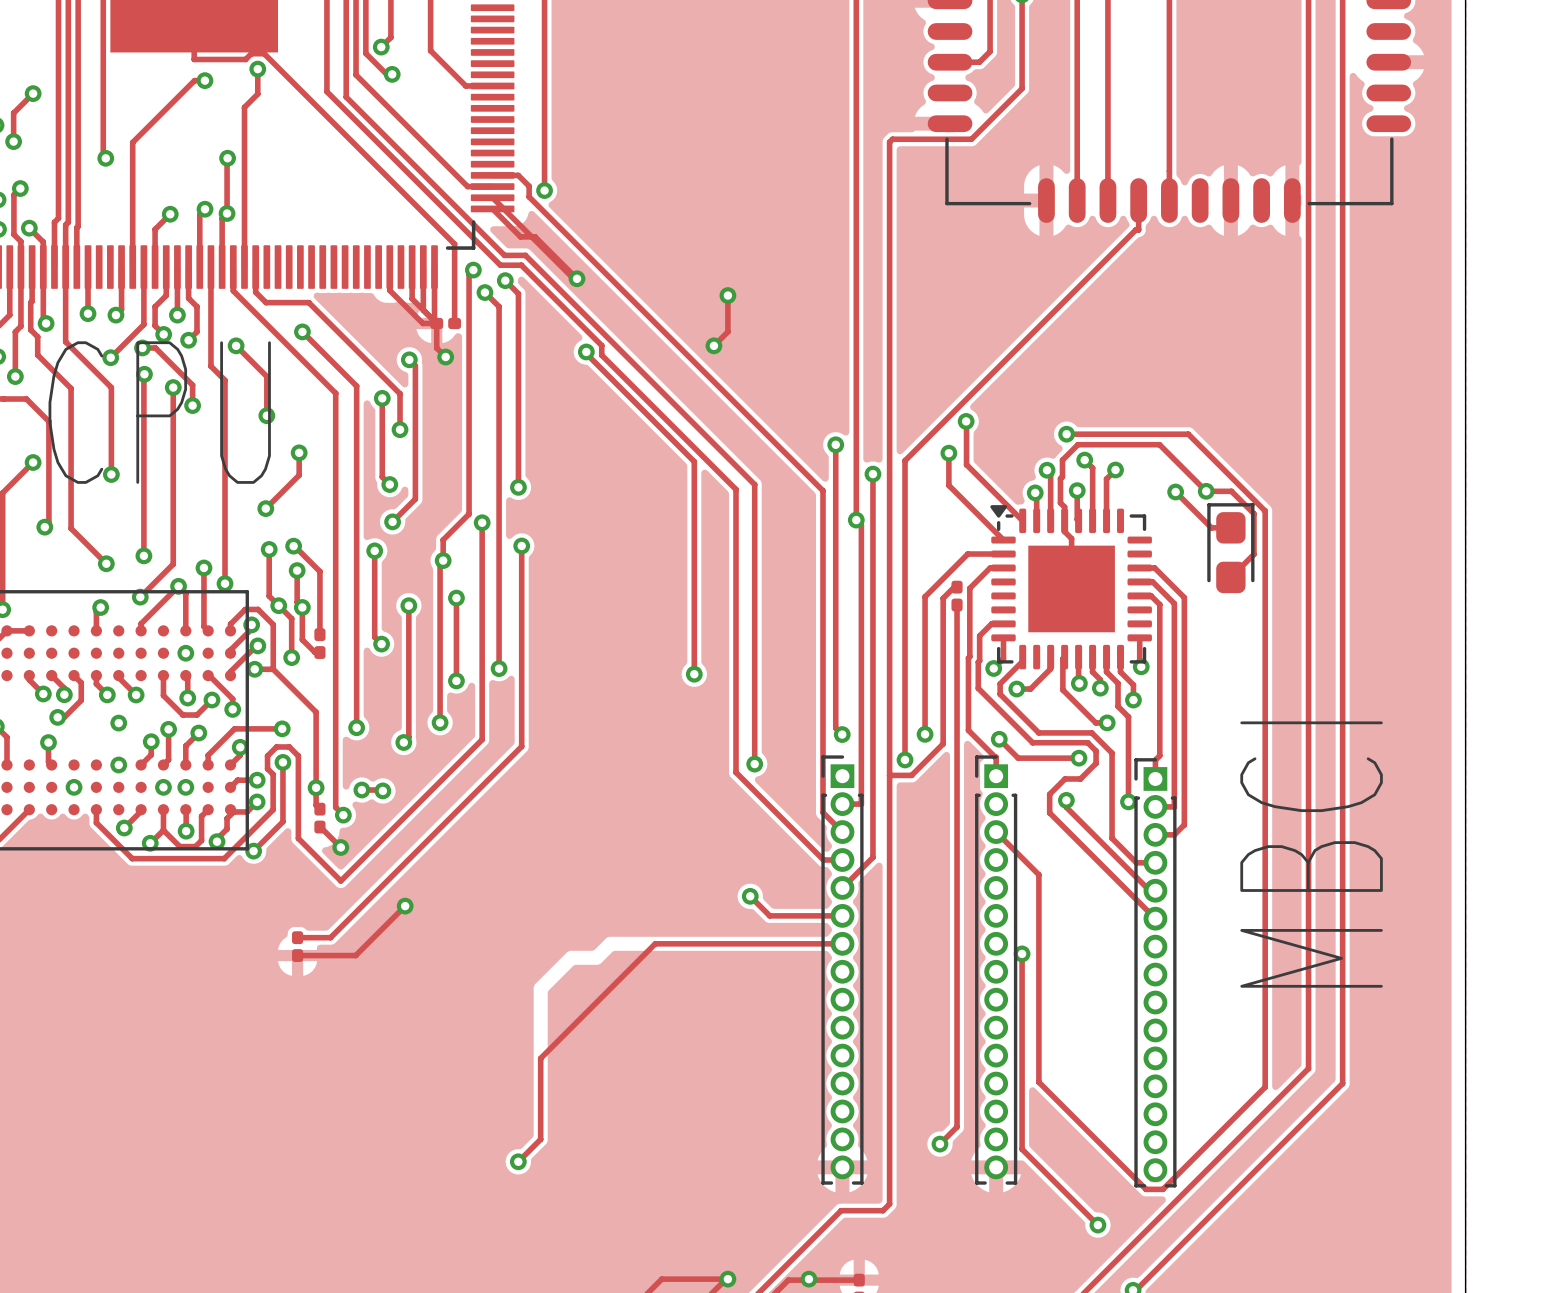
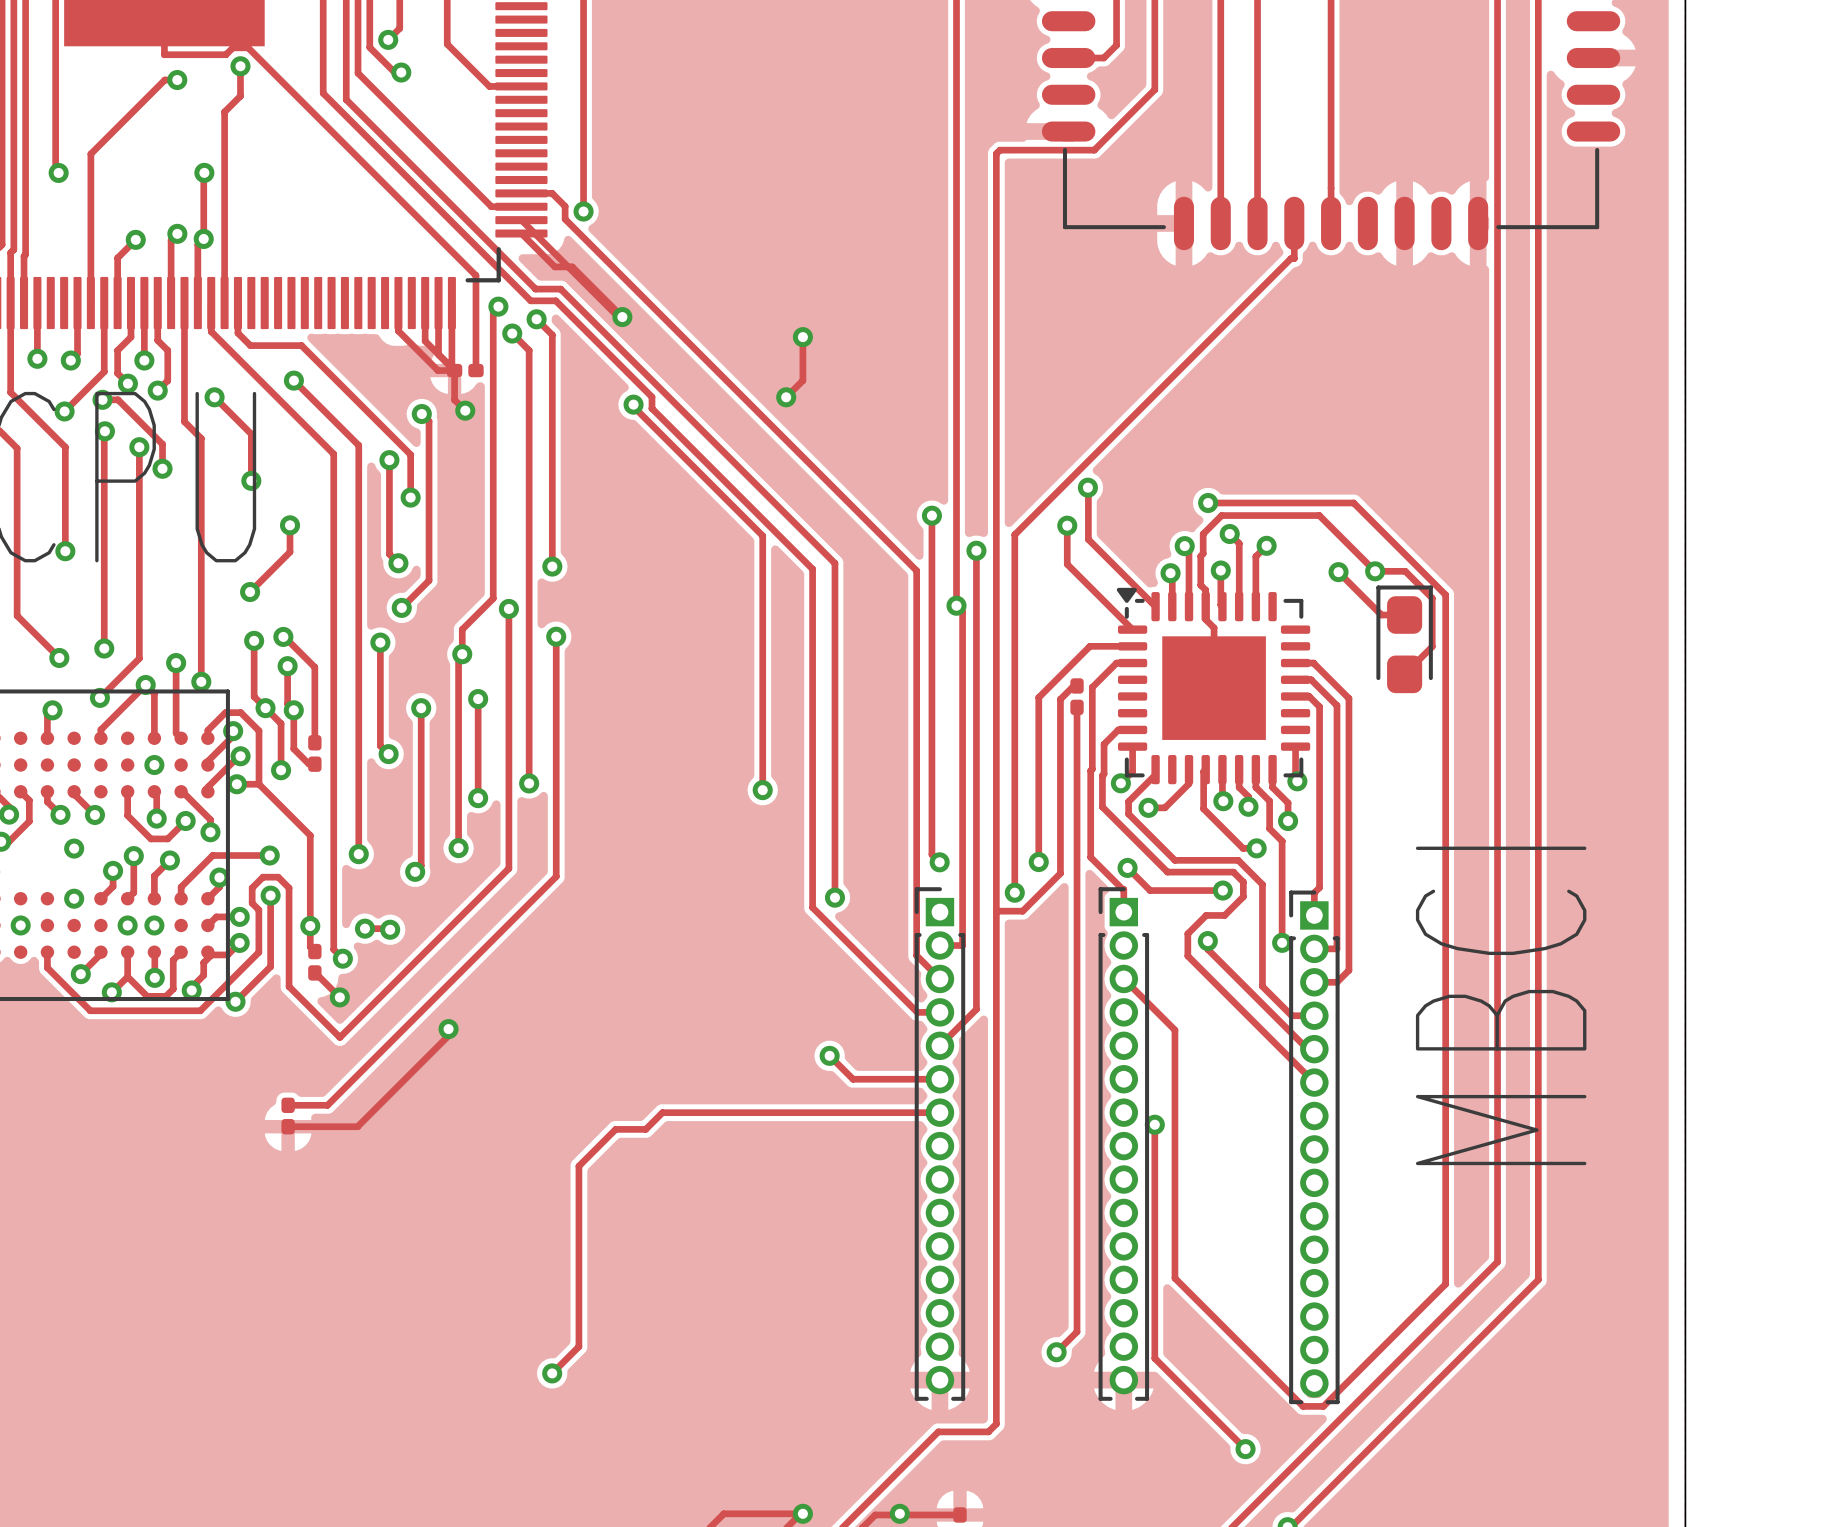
track: none -> (448, 1029) (448, 1035) (416, 1067)
via position: (405, 906) -> (448, 1029)
track: (655, 943) (540, 1058) -> (715, 1112) (662, 1112) (645, 1129) (615, 1129) (578, 1166) (578, 1249)

